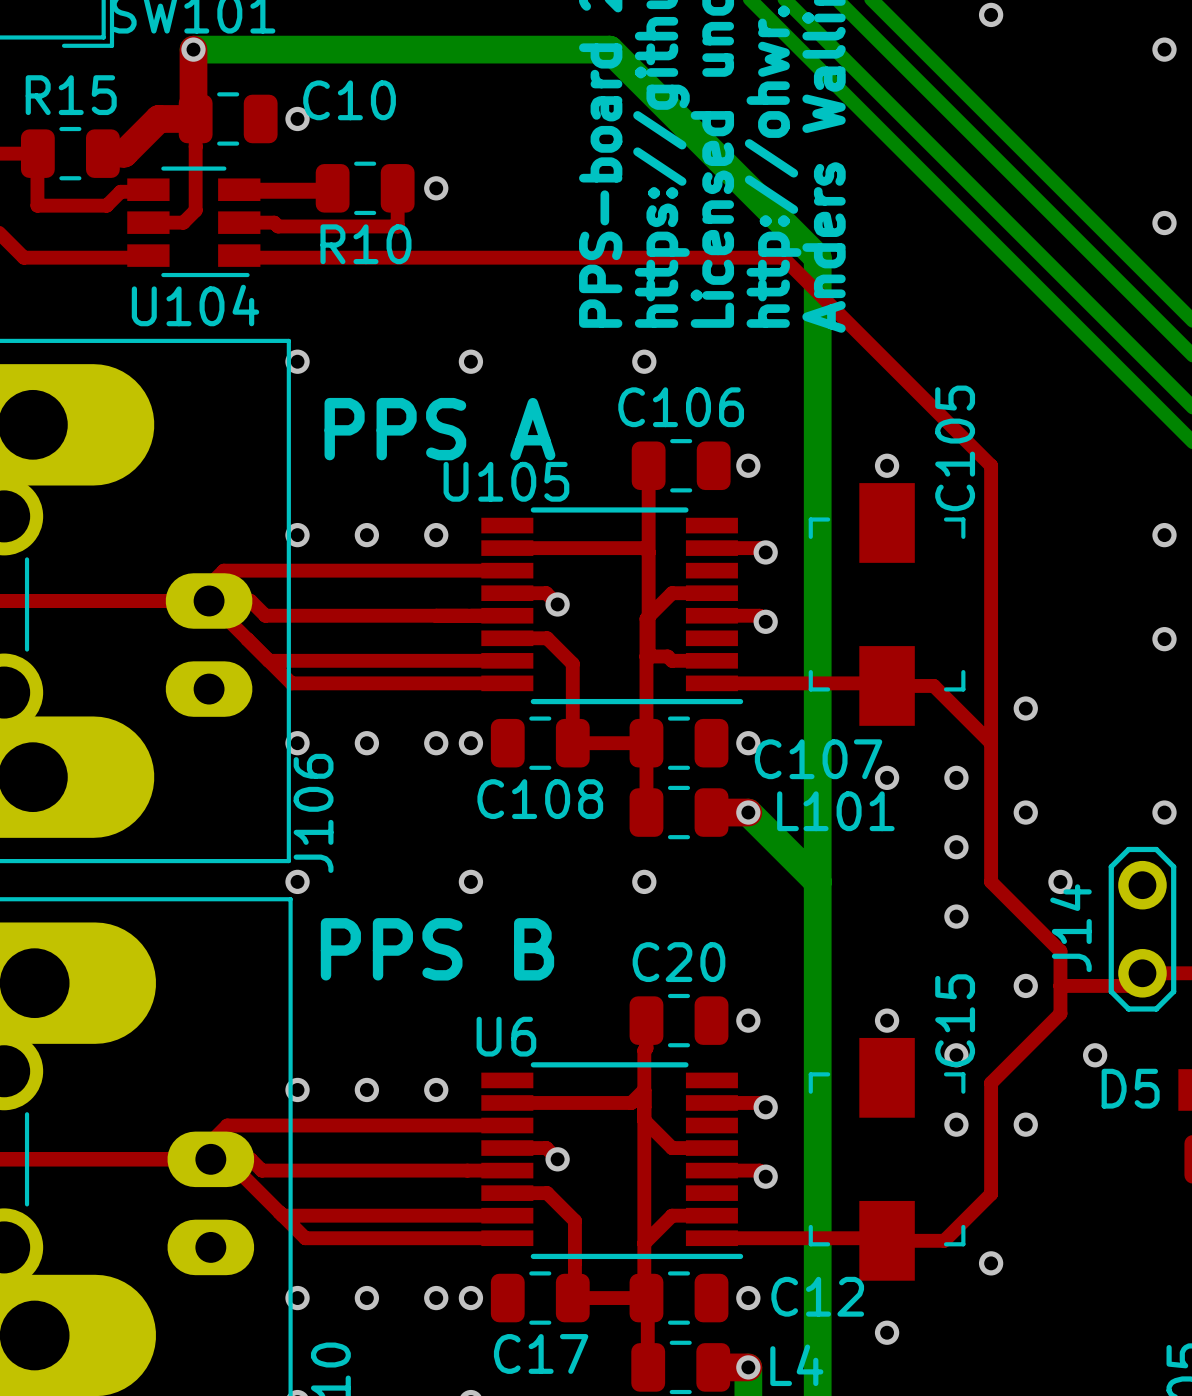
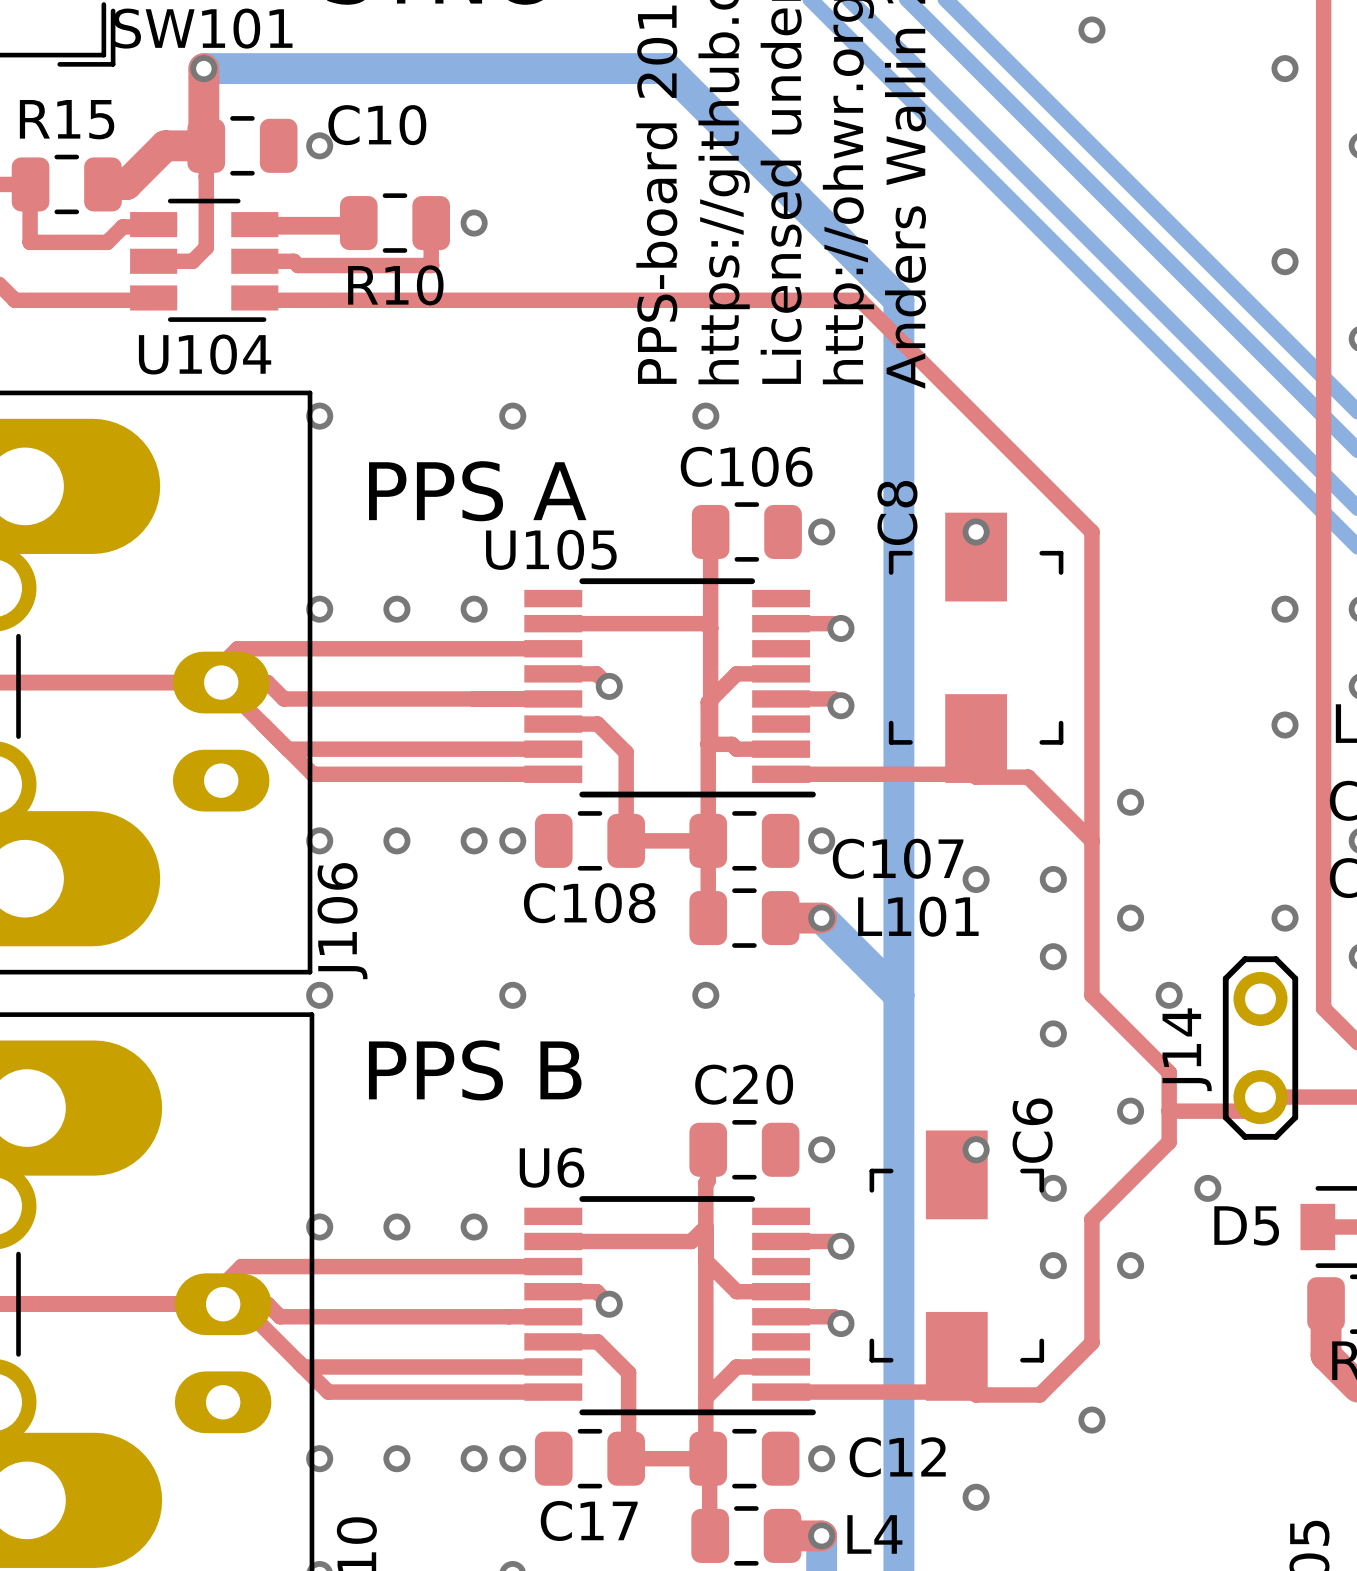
C105 name: C105 (955, 448) -> C8 (897, 512)
C105 position: (887, 604) -> (976, 647)
C6: none -> (956, 1265)
C15: (887, 1159) -> none

